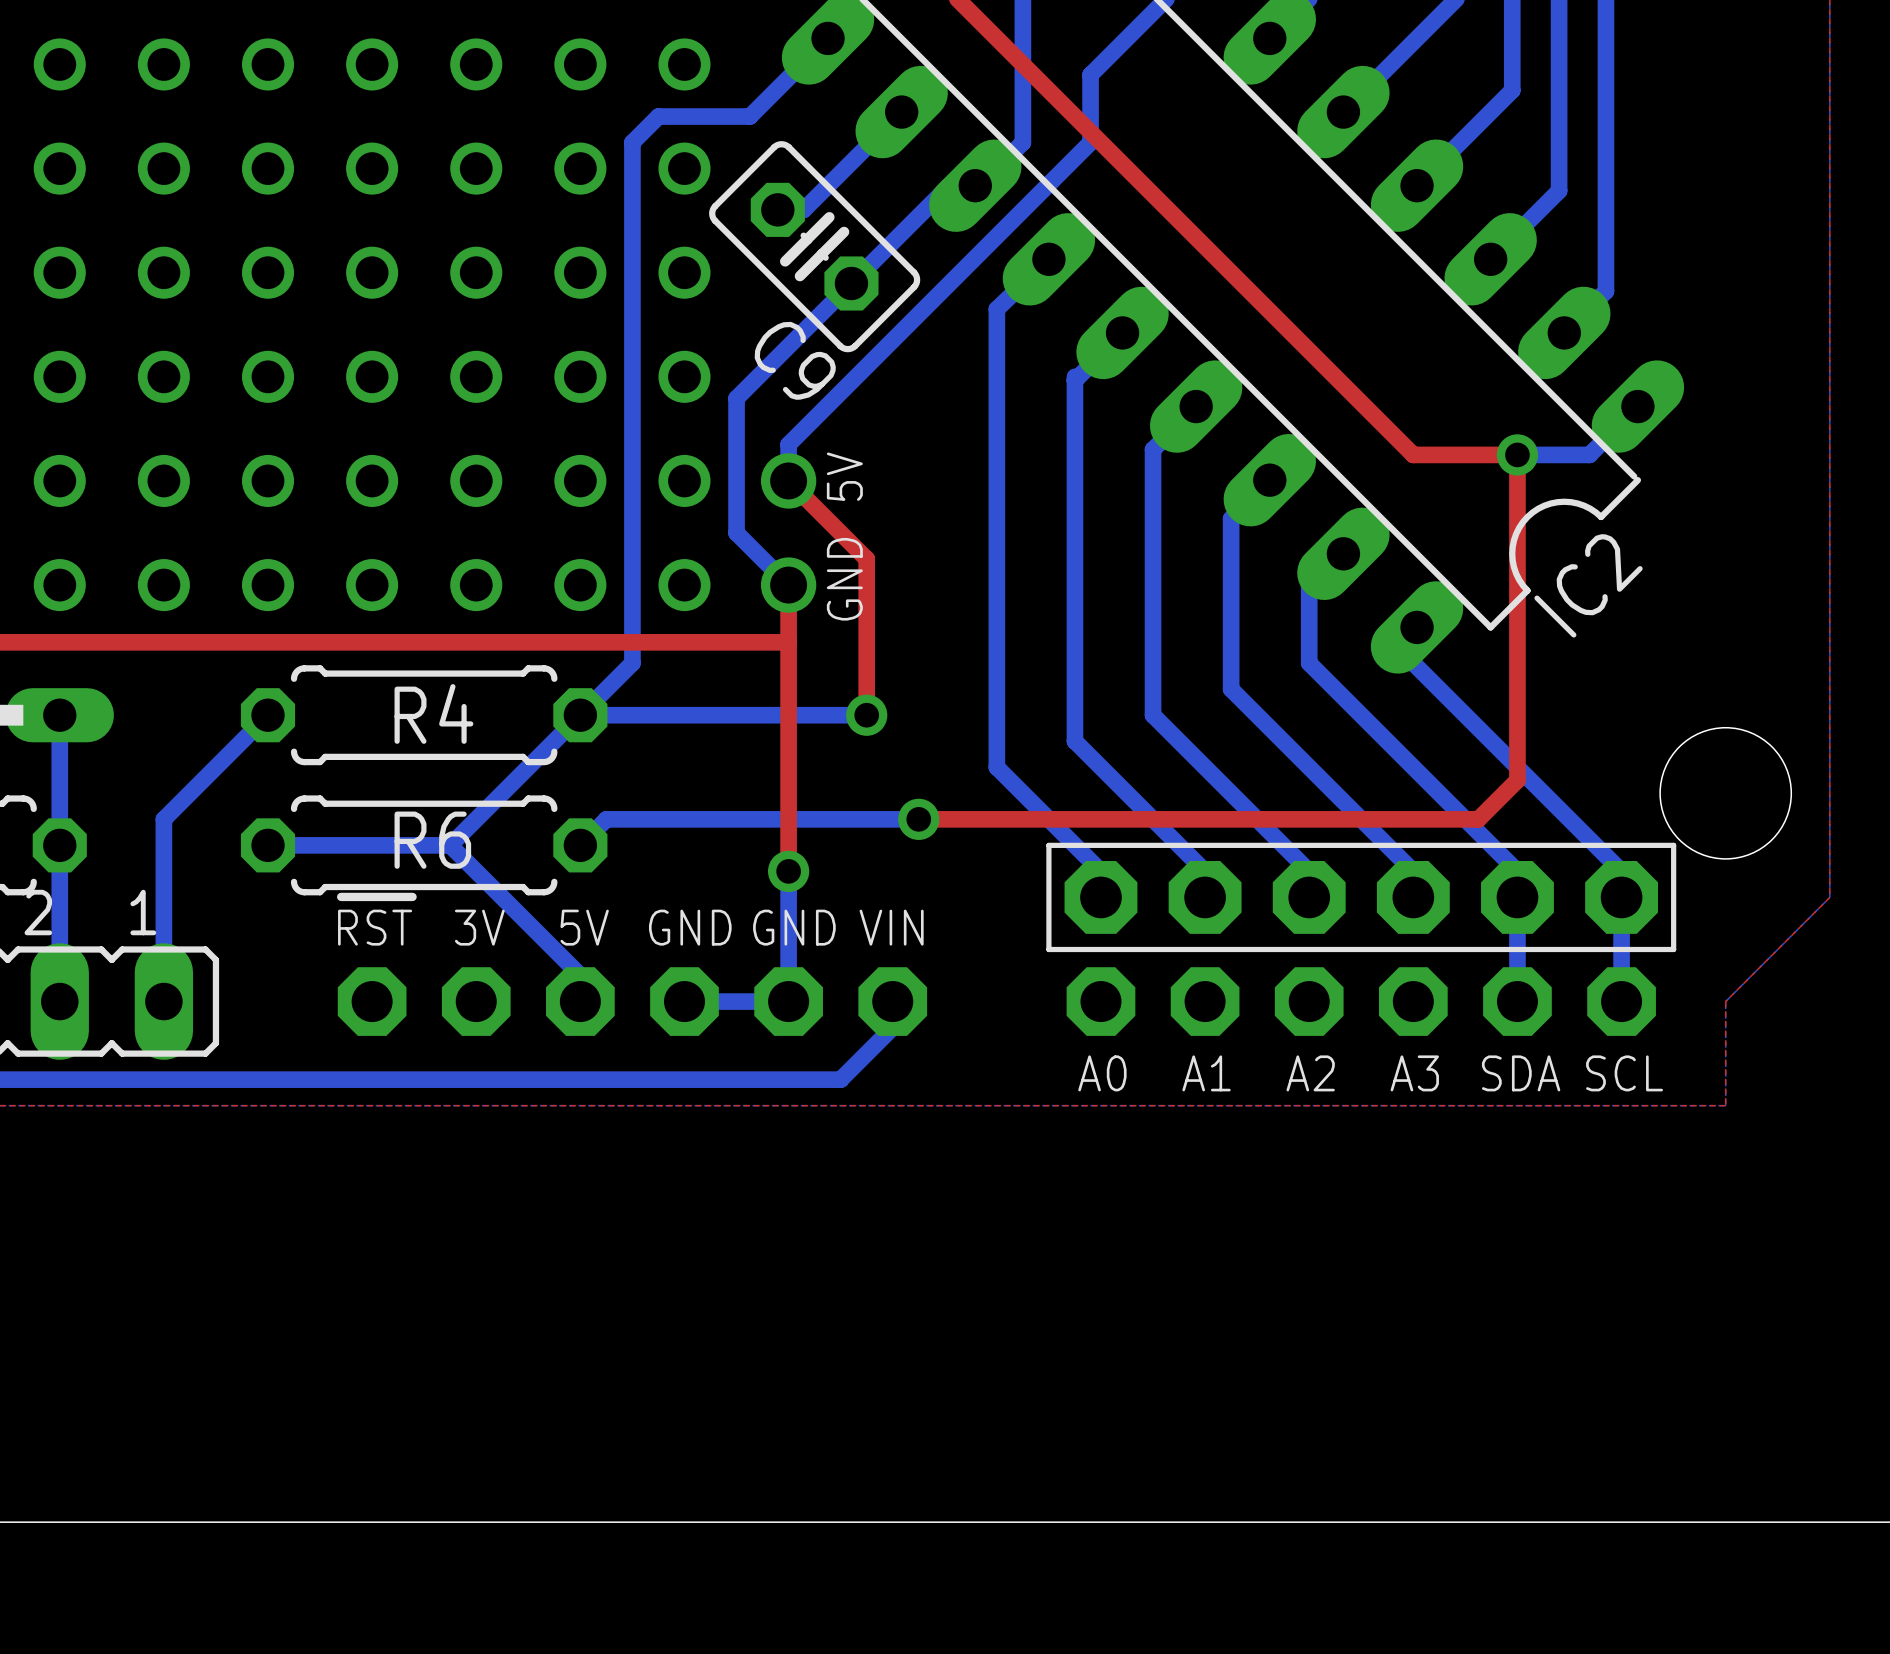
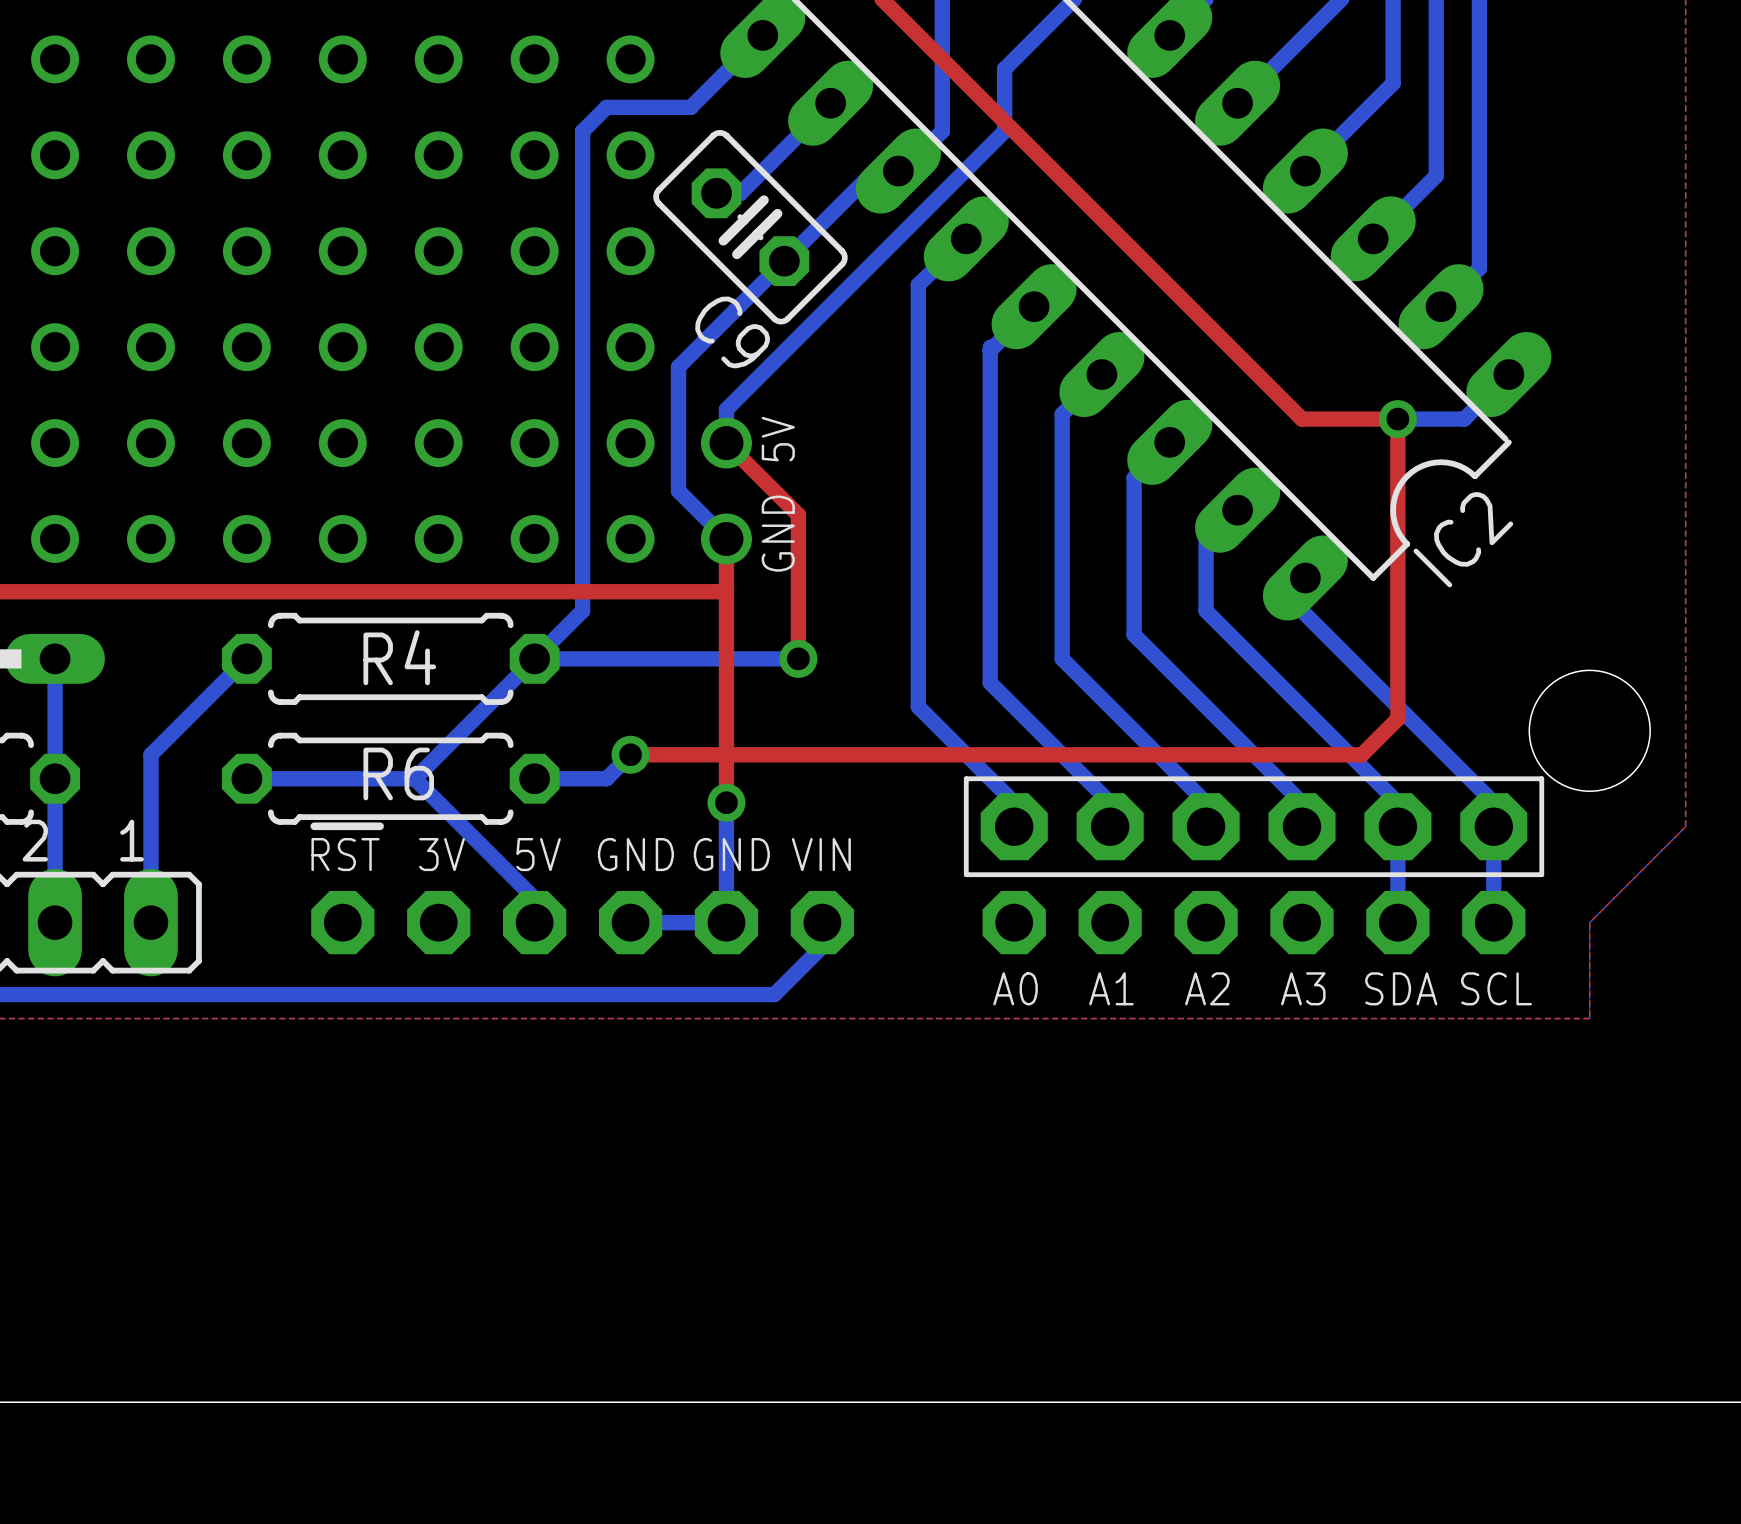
top track: none -> (630, 754) (846, 754)
bottom track: (918, 819) (606, 819) (580, 845) -> (630, 754) (606, 778) (534, 778)
via position: (918, 819) -> (630, 754)

